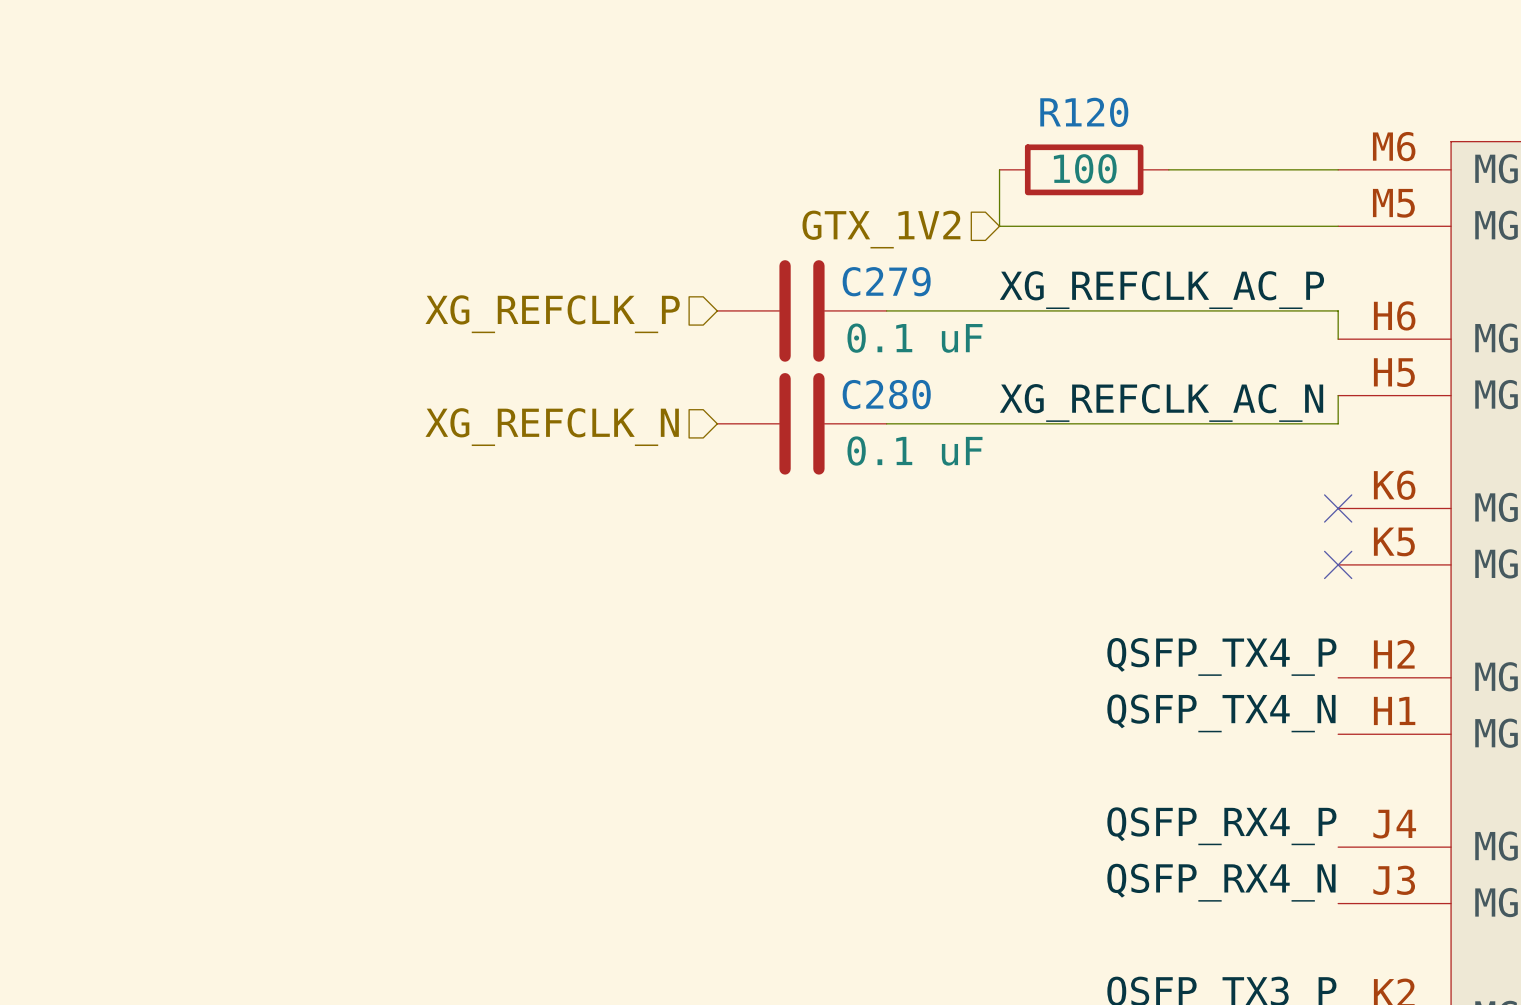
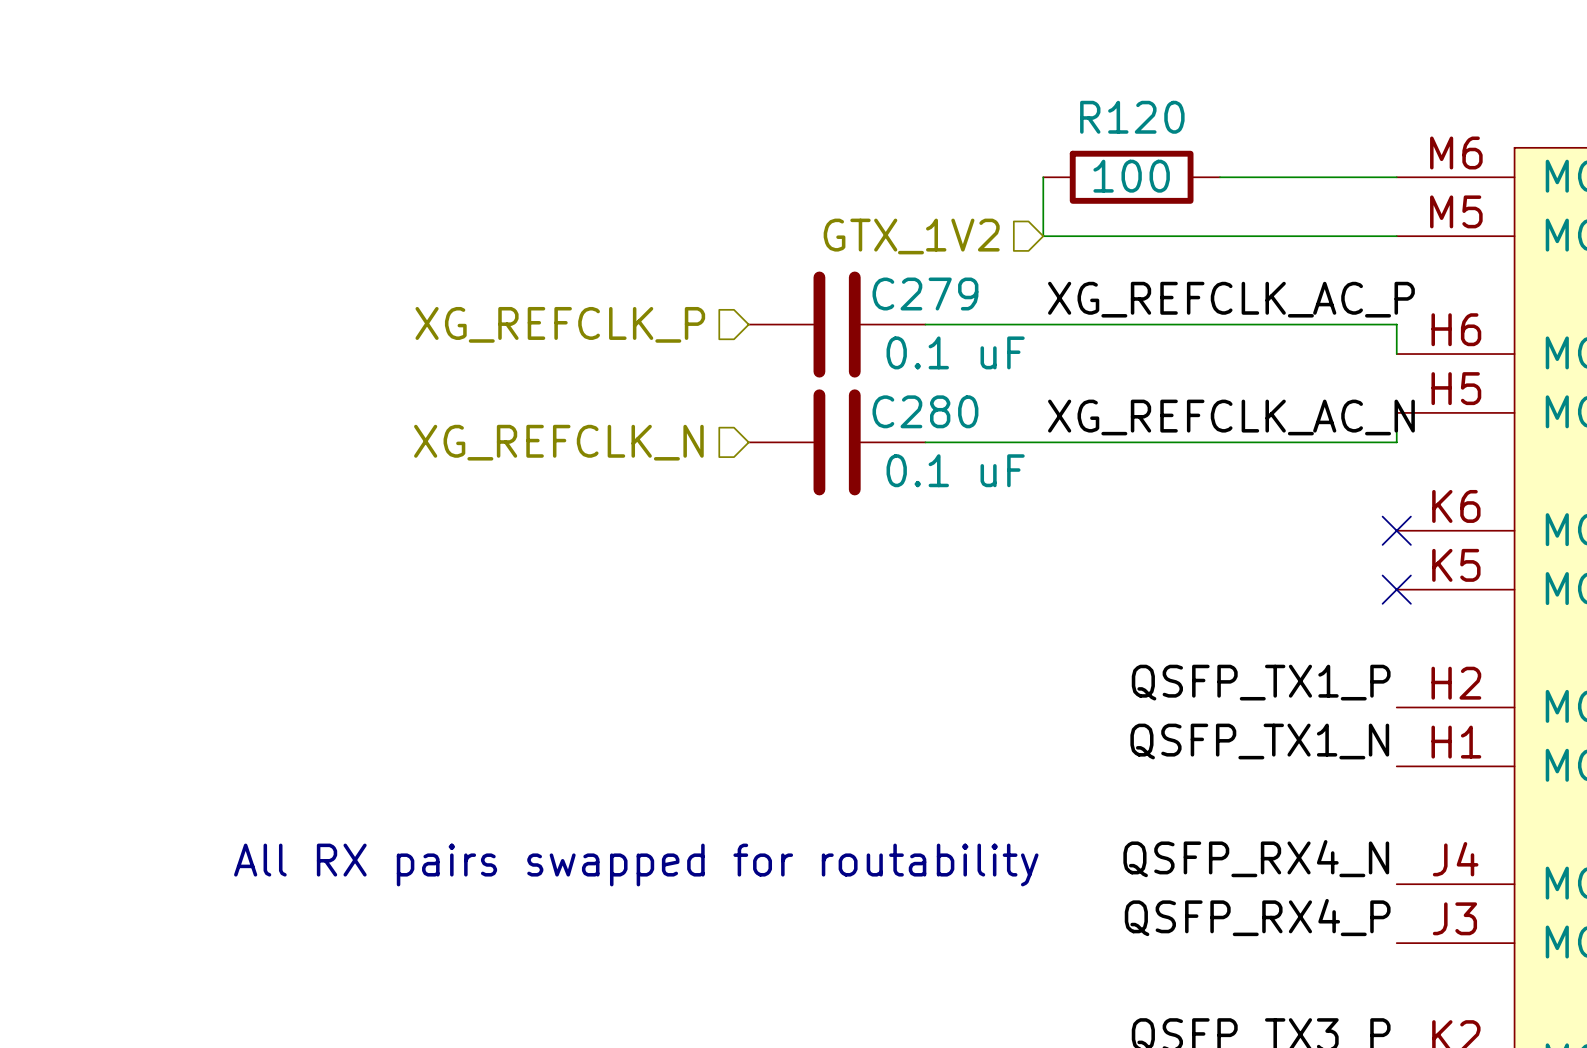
label: QSFP_TX4_P (1221, 656) -> QSFP_TX1_P (1261, 682)
label: QSFP_TX4_N (1221, 713) -> QSFP_TX1_N (1259, 741)
label: QSFP_RX4_P (1221, 826) -> QSFP_RX4_N (1256, 858)
text: none -> All RX pairs swapped for routability (636, 864)
label: QSFP_RX4_N (1221, 882) -> QSFP_RX4_P (1257, 917)

